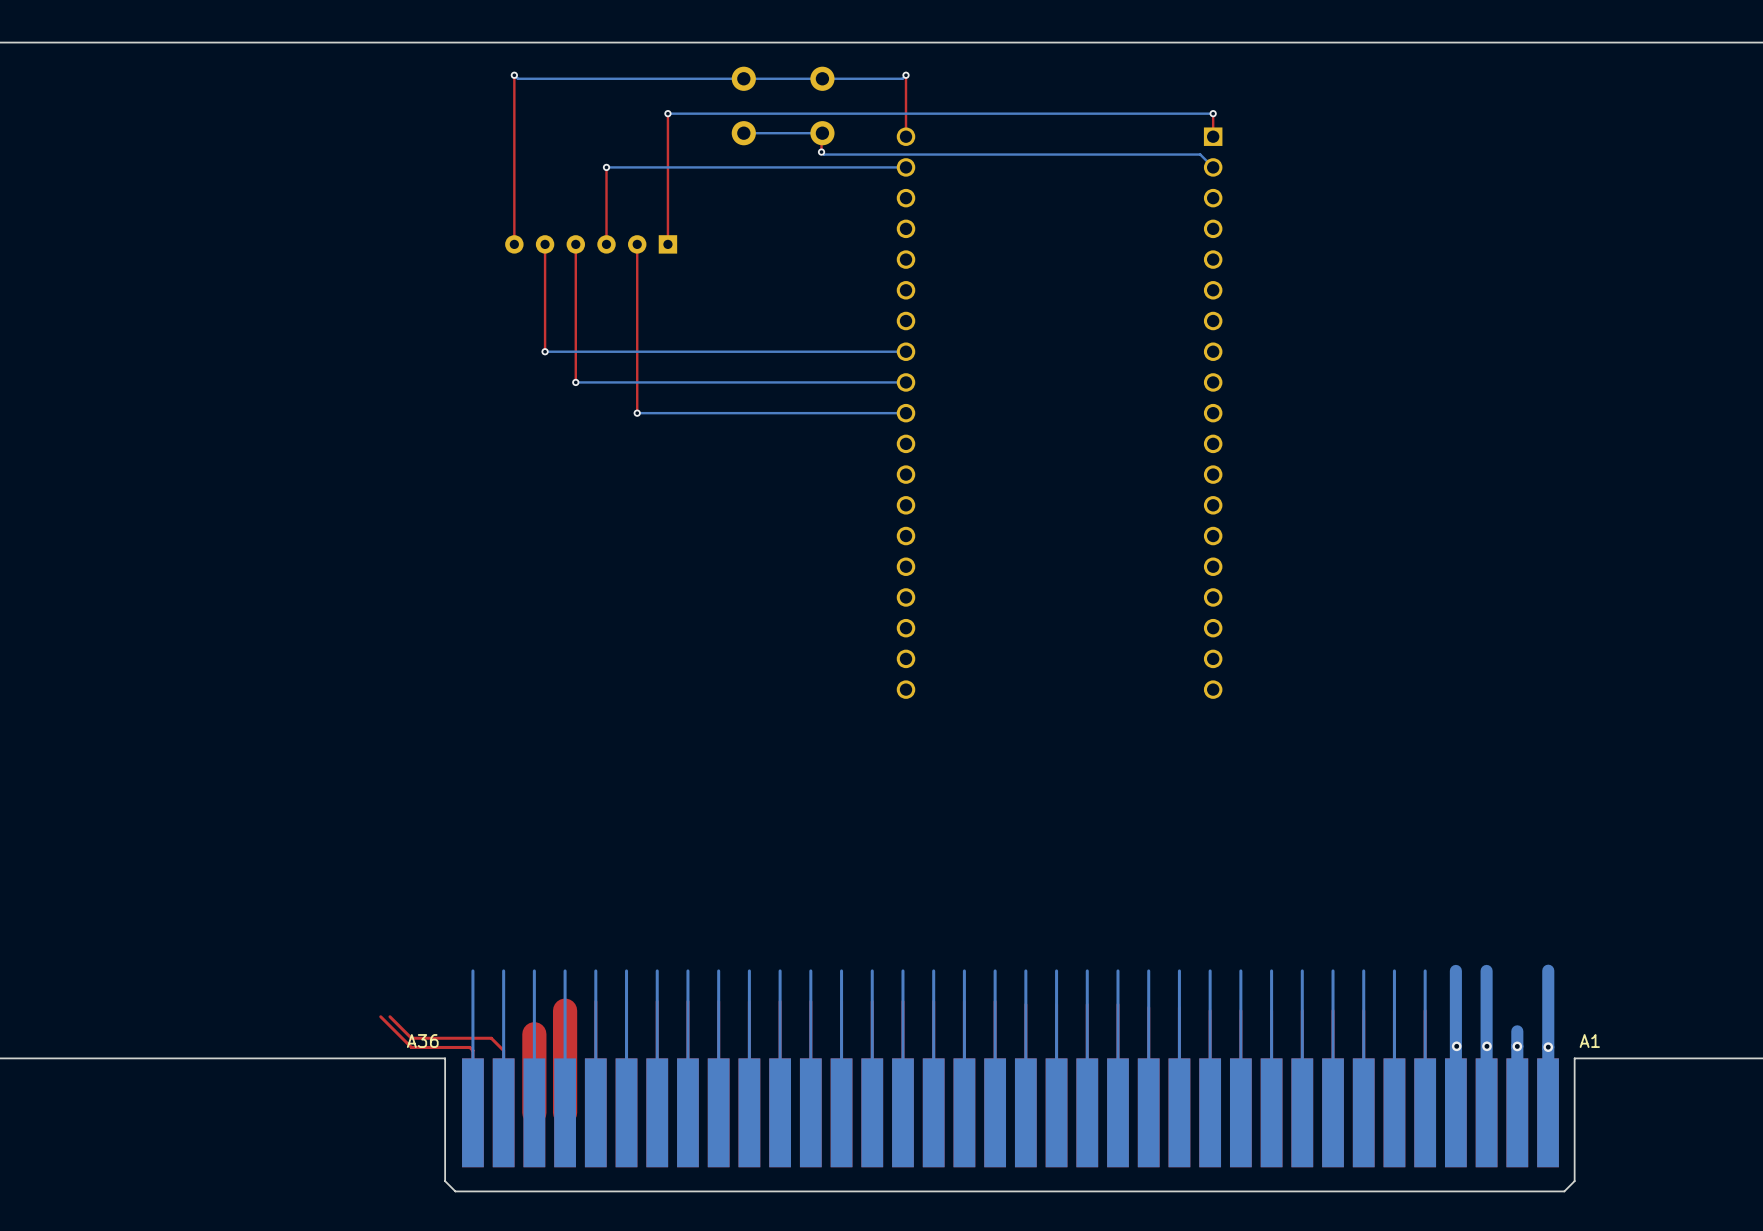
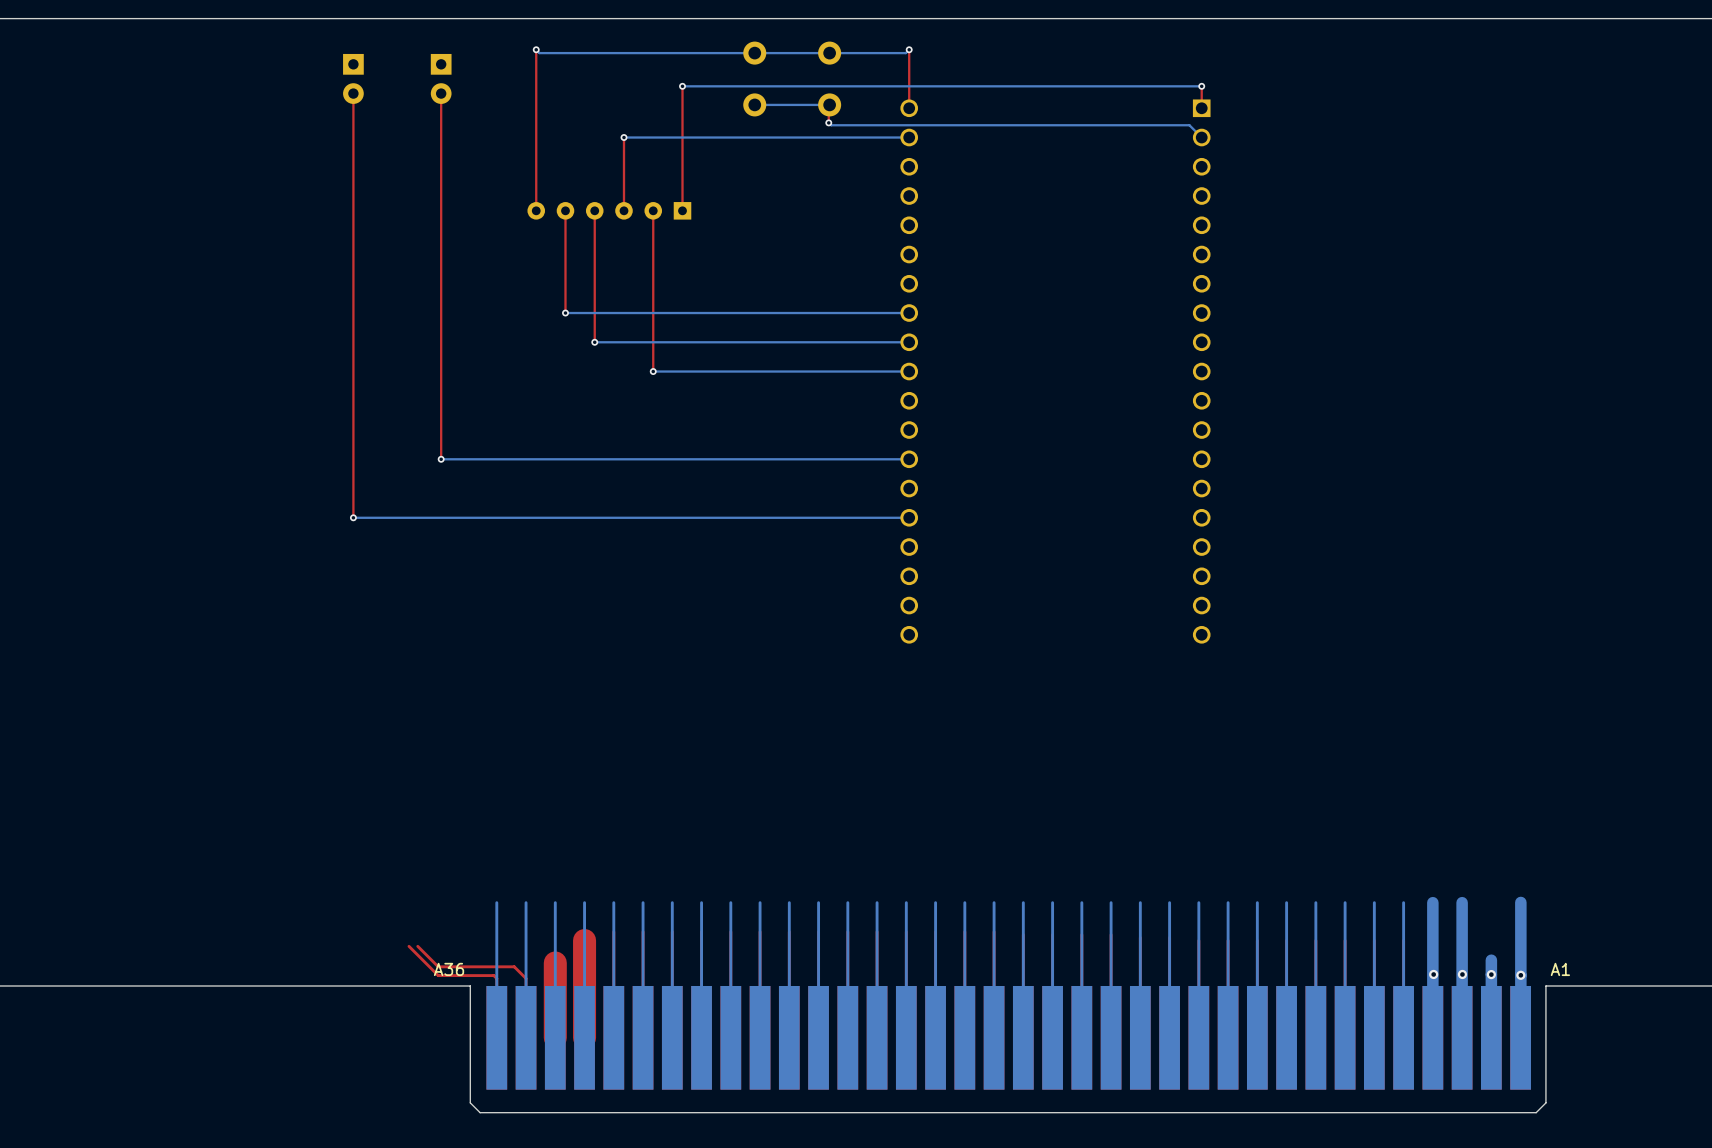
part: none -> (353, 78)
part: none -> (441, 78)
top track: none -> (353, 93) (353, 517)
top track: none -> (441, 93) (441, 459)
via: none -> (441, 459)
bottom track: none -> (909, 459) (441, 459)
via: none -> (353, 517)
bottom track: none -> (909, 517) (353, 517)

